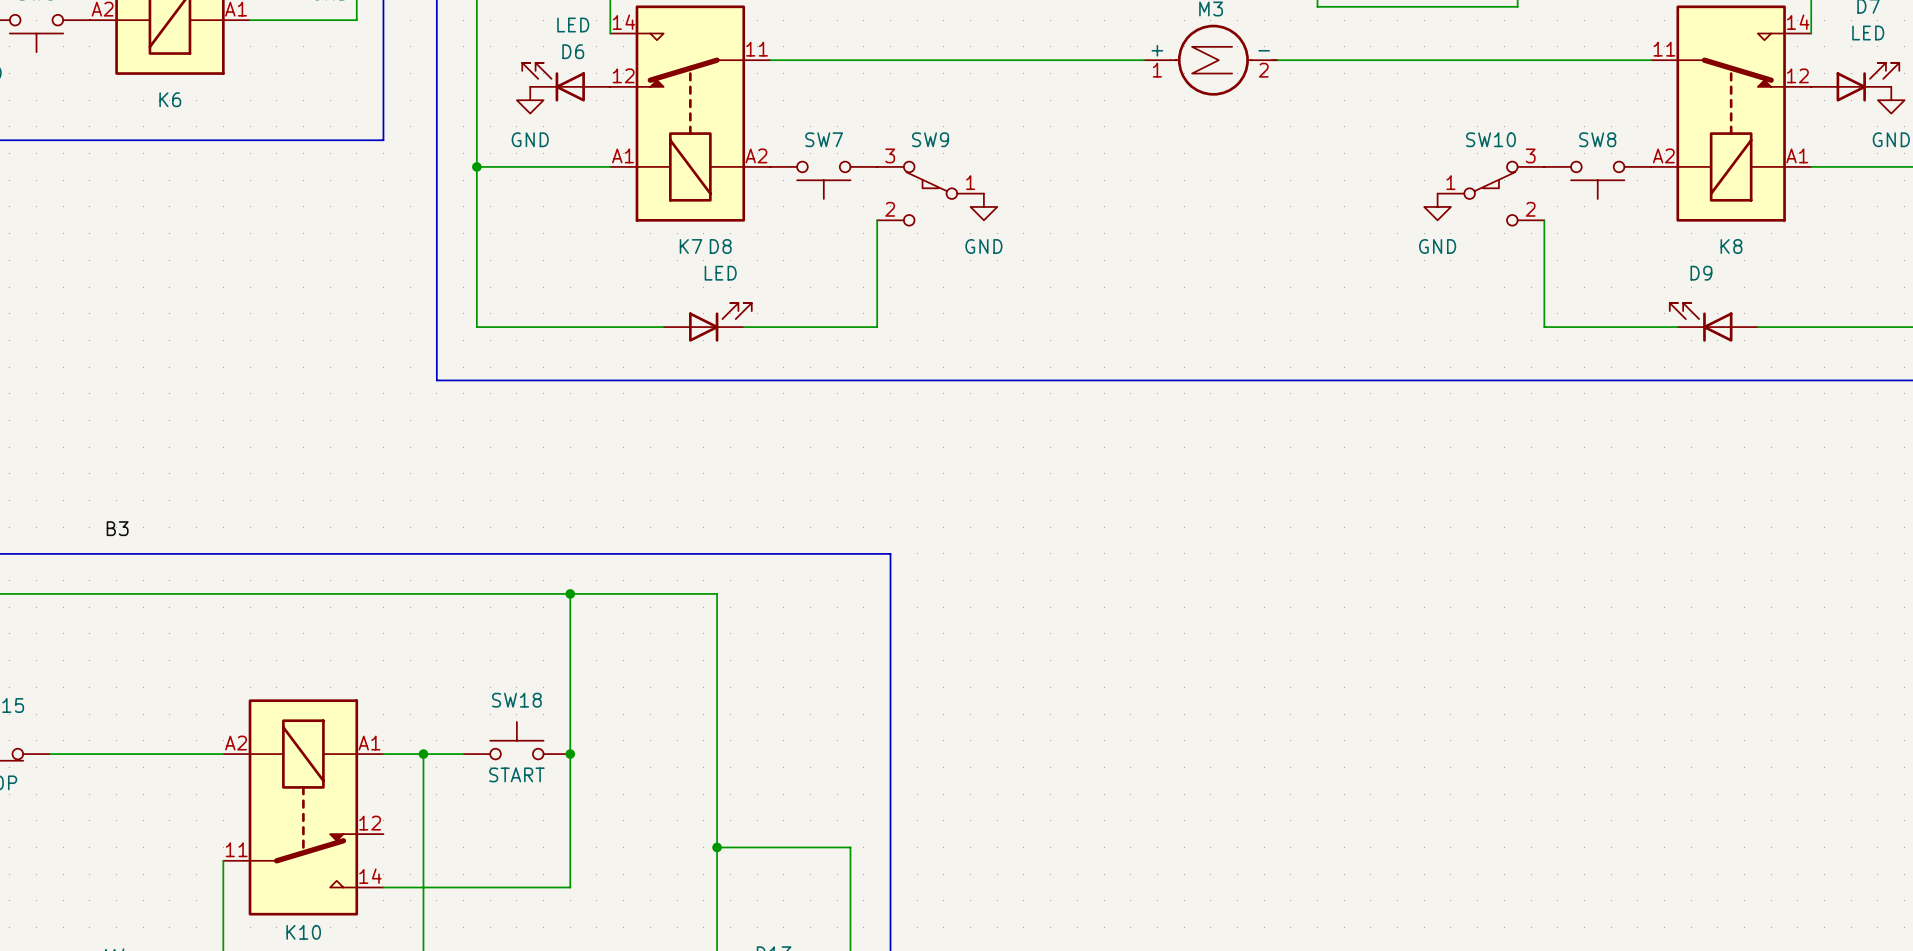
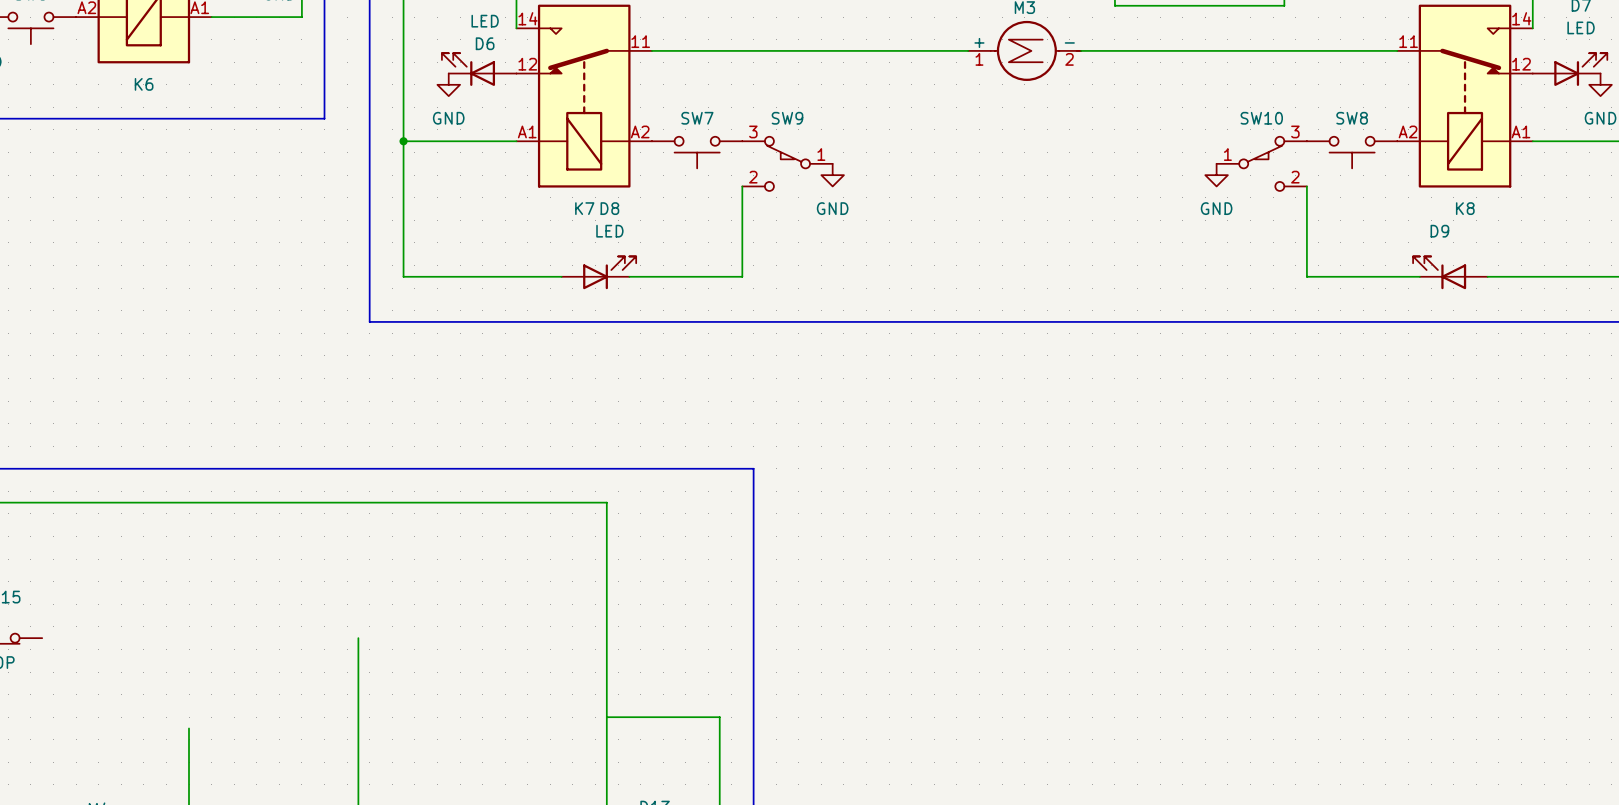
label: B3 (117, 528) -> none
wire: (570, 593) (570, 887) (383, 887) -> none
junction: (570, 593) -> none
SW18: START (516, 740) -> none
wire: (49, 754) (223, 754) -> none
wire: (383, 754) (463, 754) -> none
junction: (423, 754) -> none
junction: (570, 754) -> none
K10: (303, 807) -> none
junction: (717, 847) -> none

